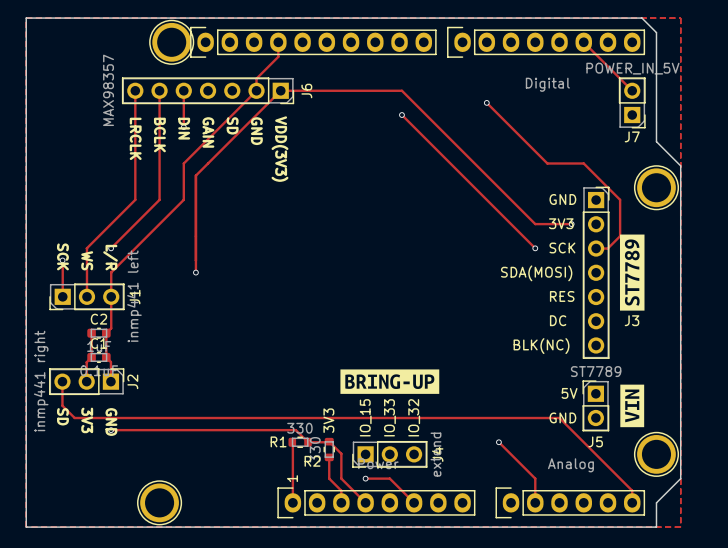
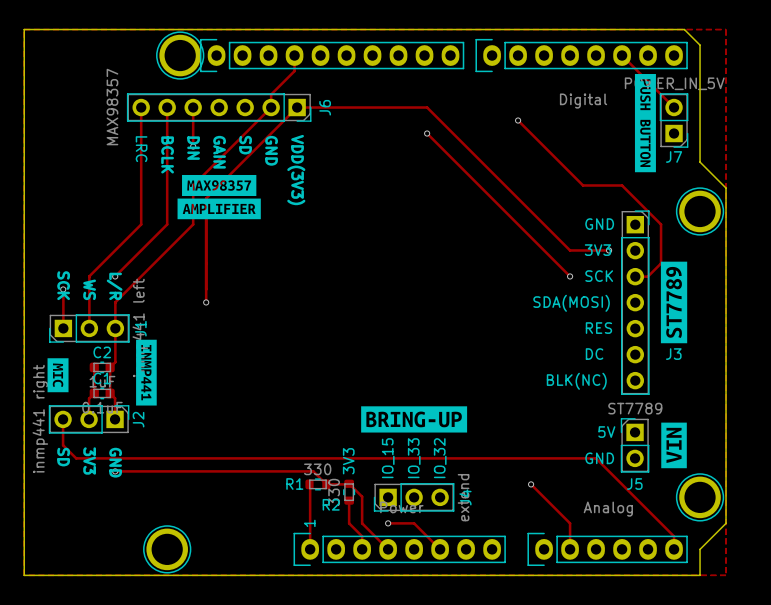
drawing: none -> [634, 74, 656, 173]
text: LRCLK (135, 138) -> LRC (141, 149)
drawing: none -> [177, 174, 261, 220]
drawing: none -> [136, 339, 157, 406]
drawing: none -> [47, 358, 69, 393]

